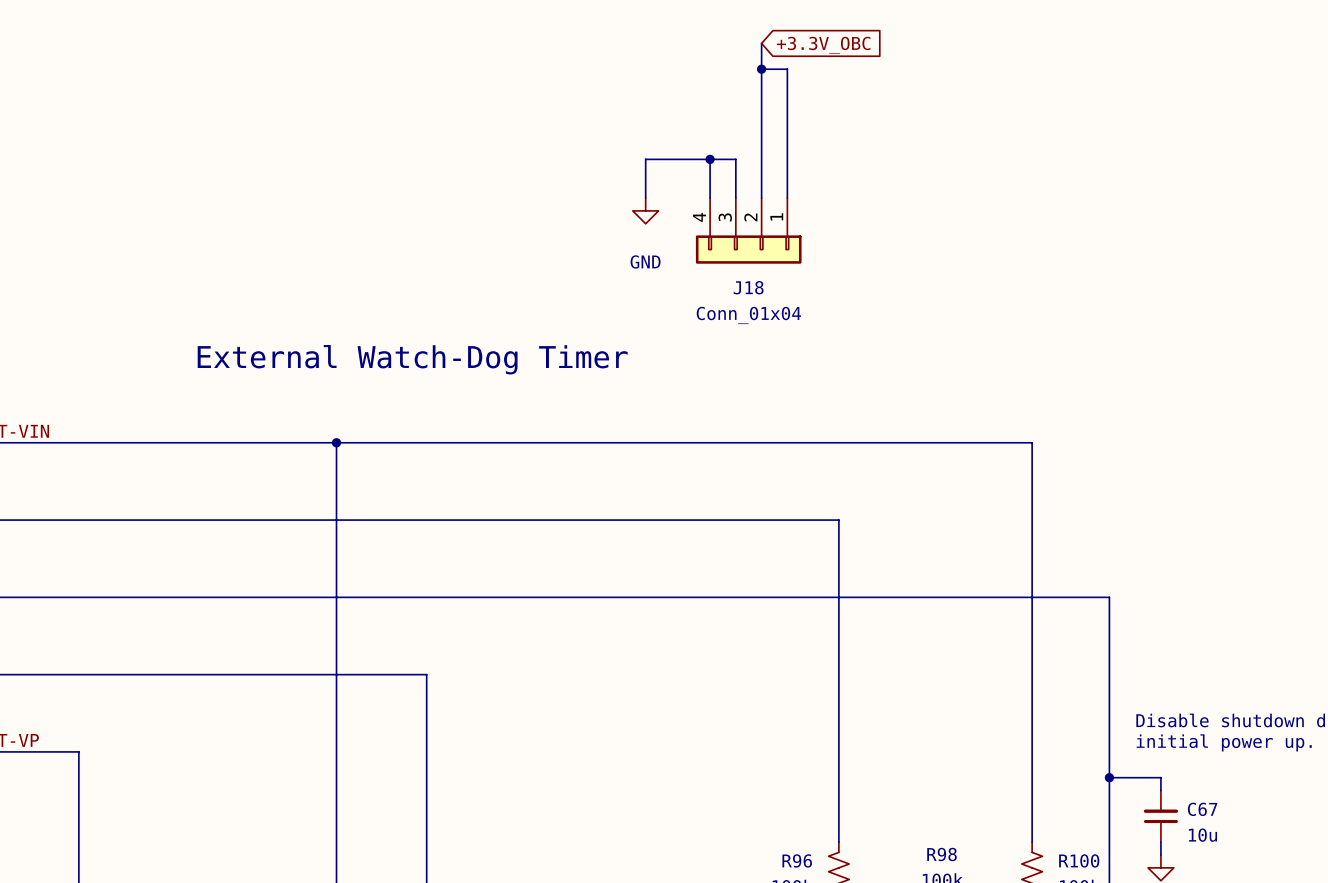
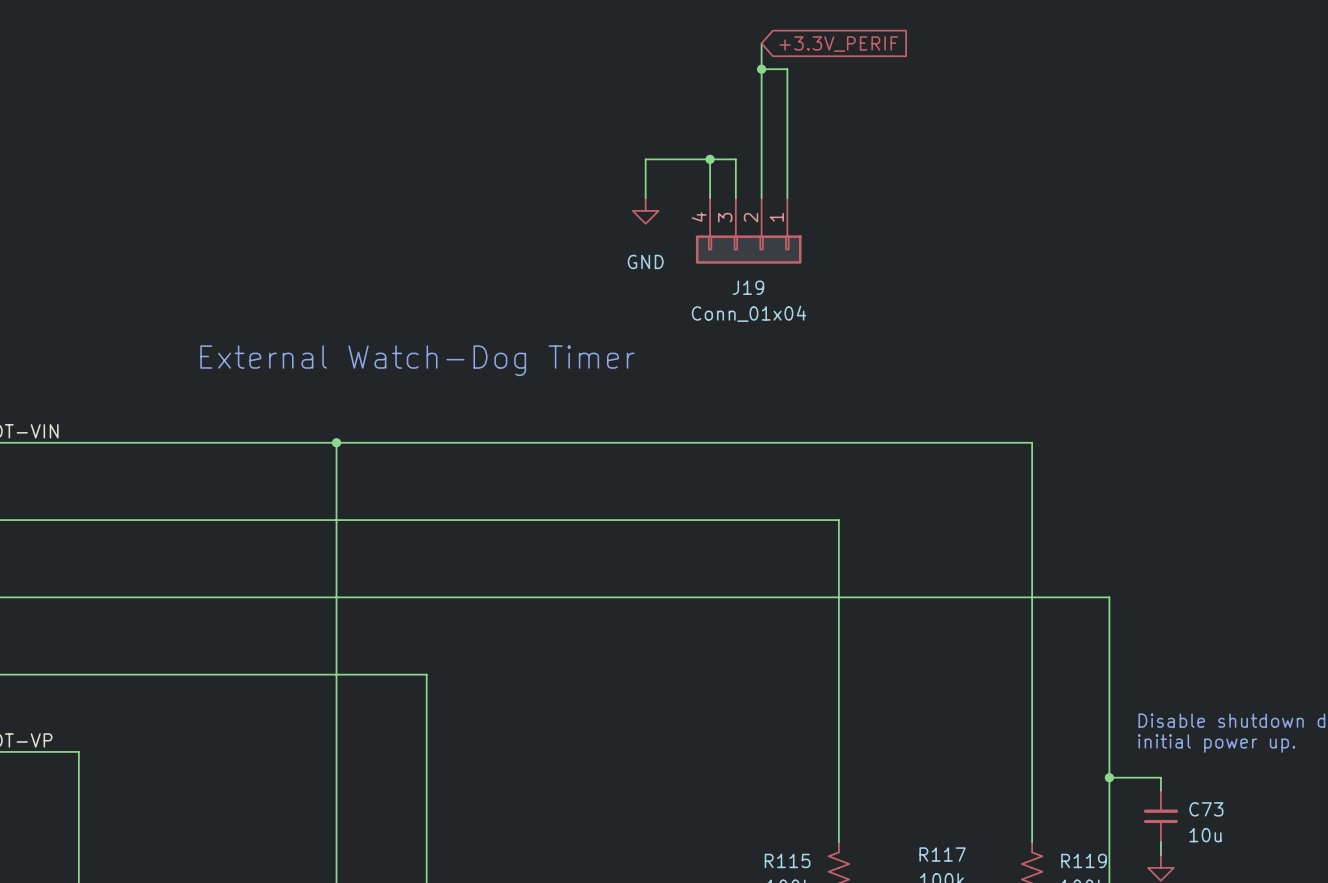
global label: +3.3V_OBC (823, 45) -> +3.3V_PERIF (838, 44)
J18 name: J18 (748, 287) -> J19 (748, 287)
C67 name: C67 (1202, 809) -> C73 (1206, 809)
R98 name: R98 (942, 854) -> R117 (942, 854)
R96 name: R96 (797, 860) -> R115 (787, 860)
R100 name: R100 (1079, 860) -> R119 (1084, 860)

